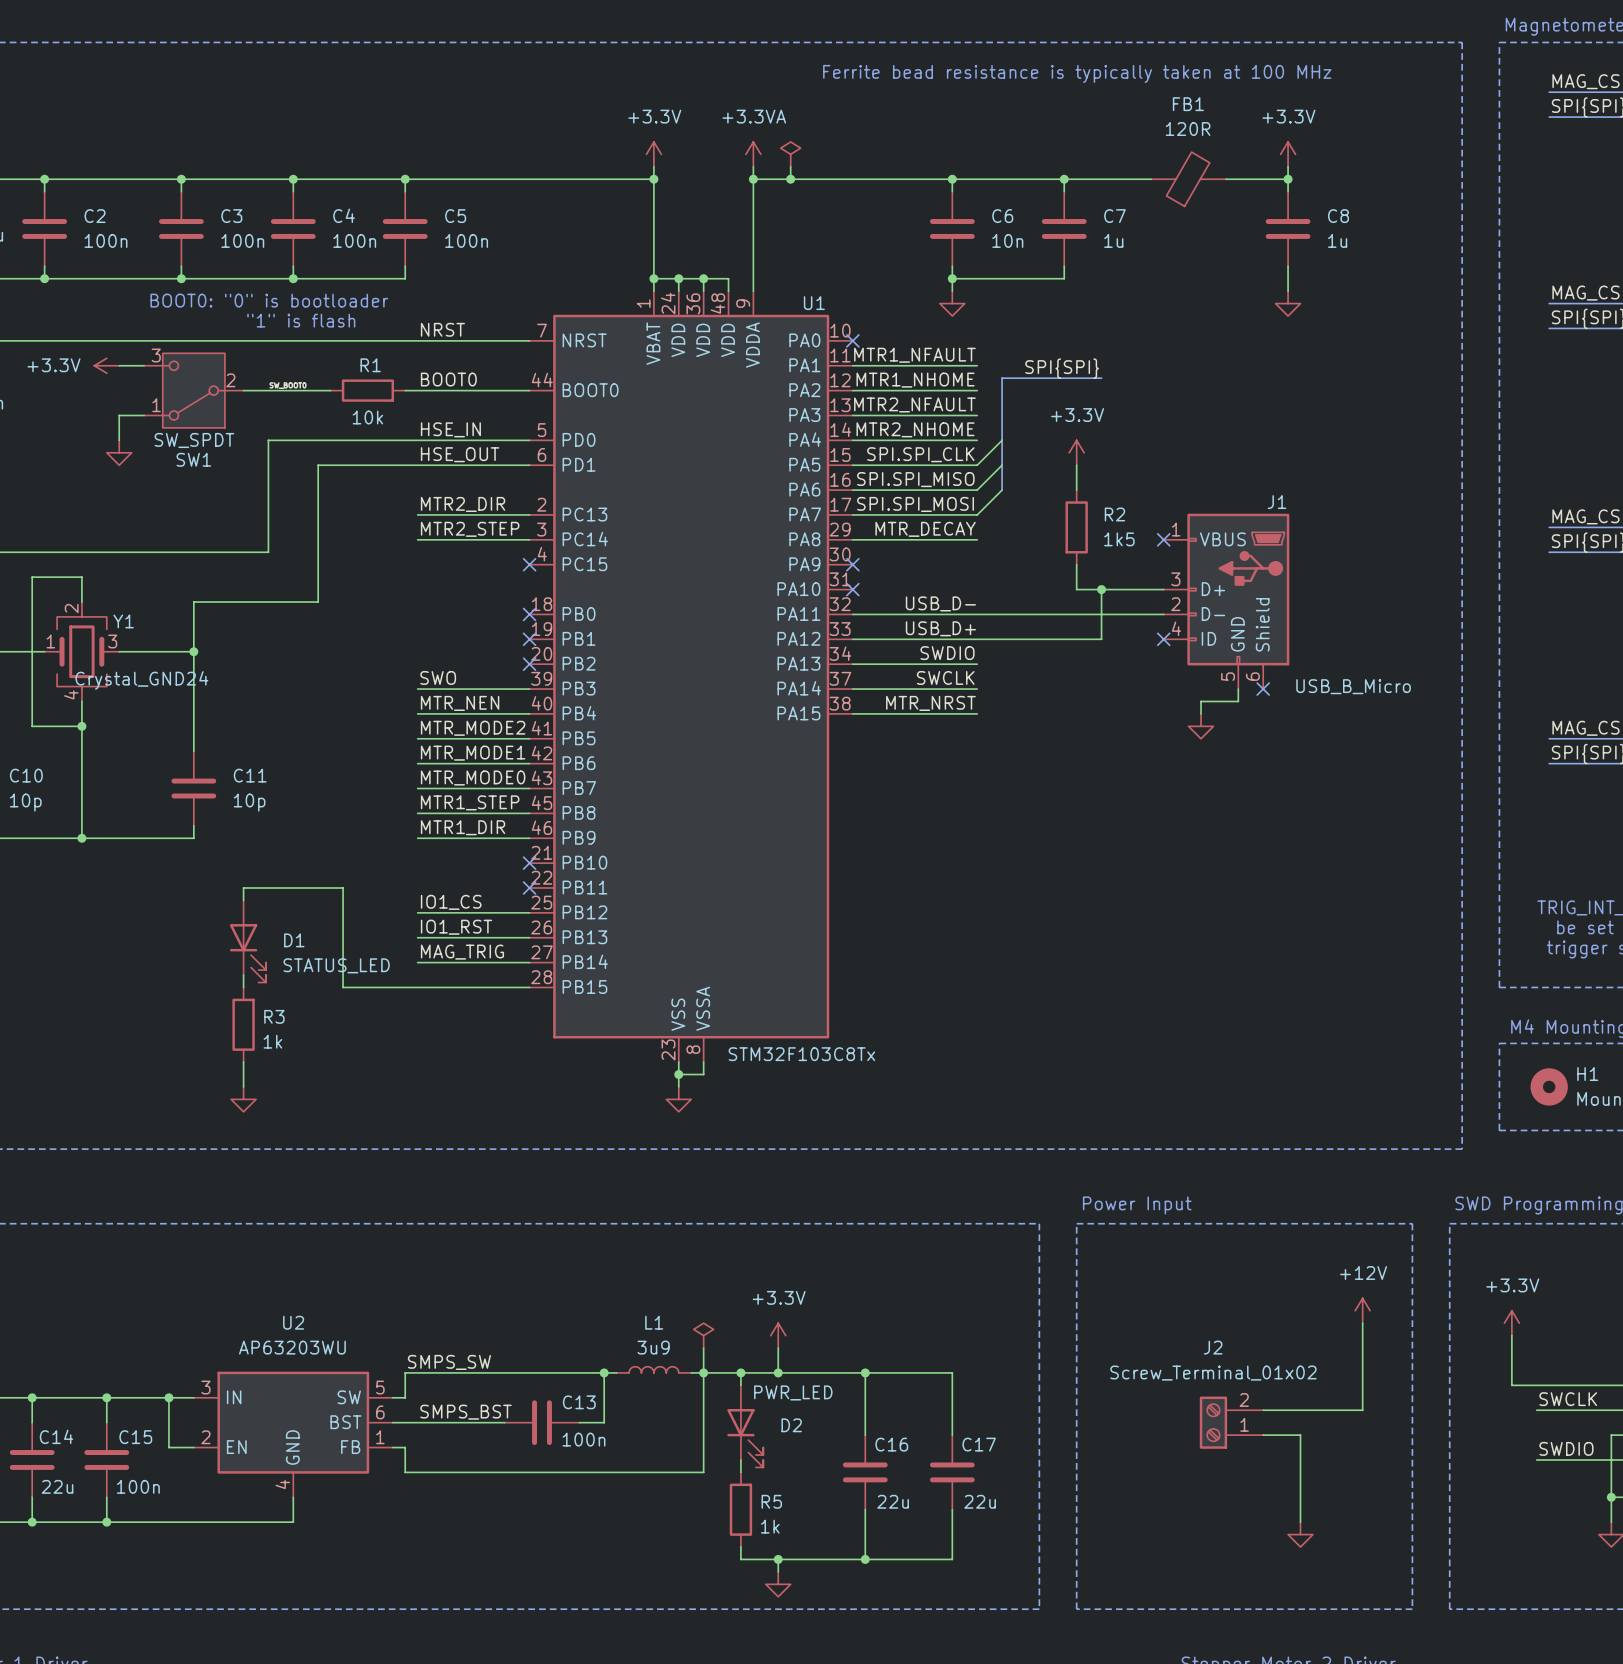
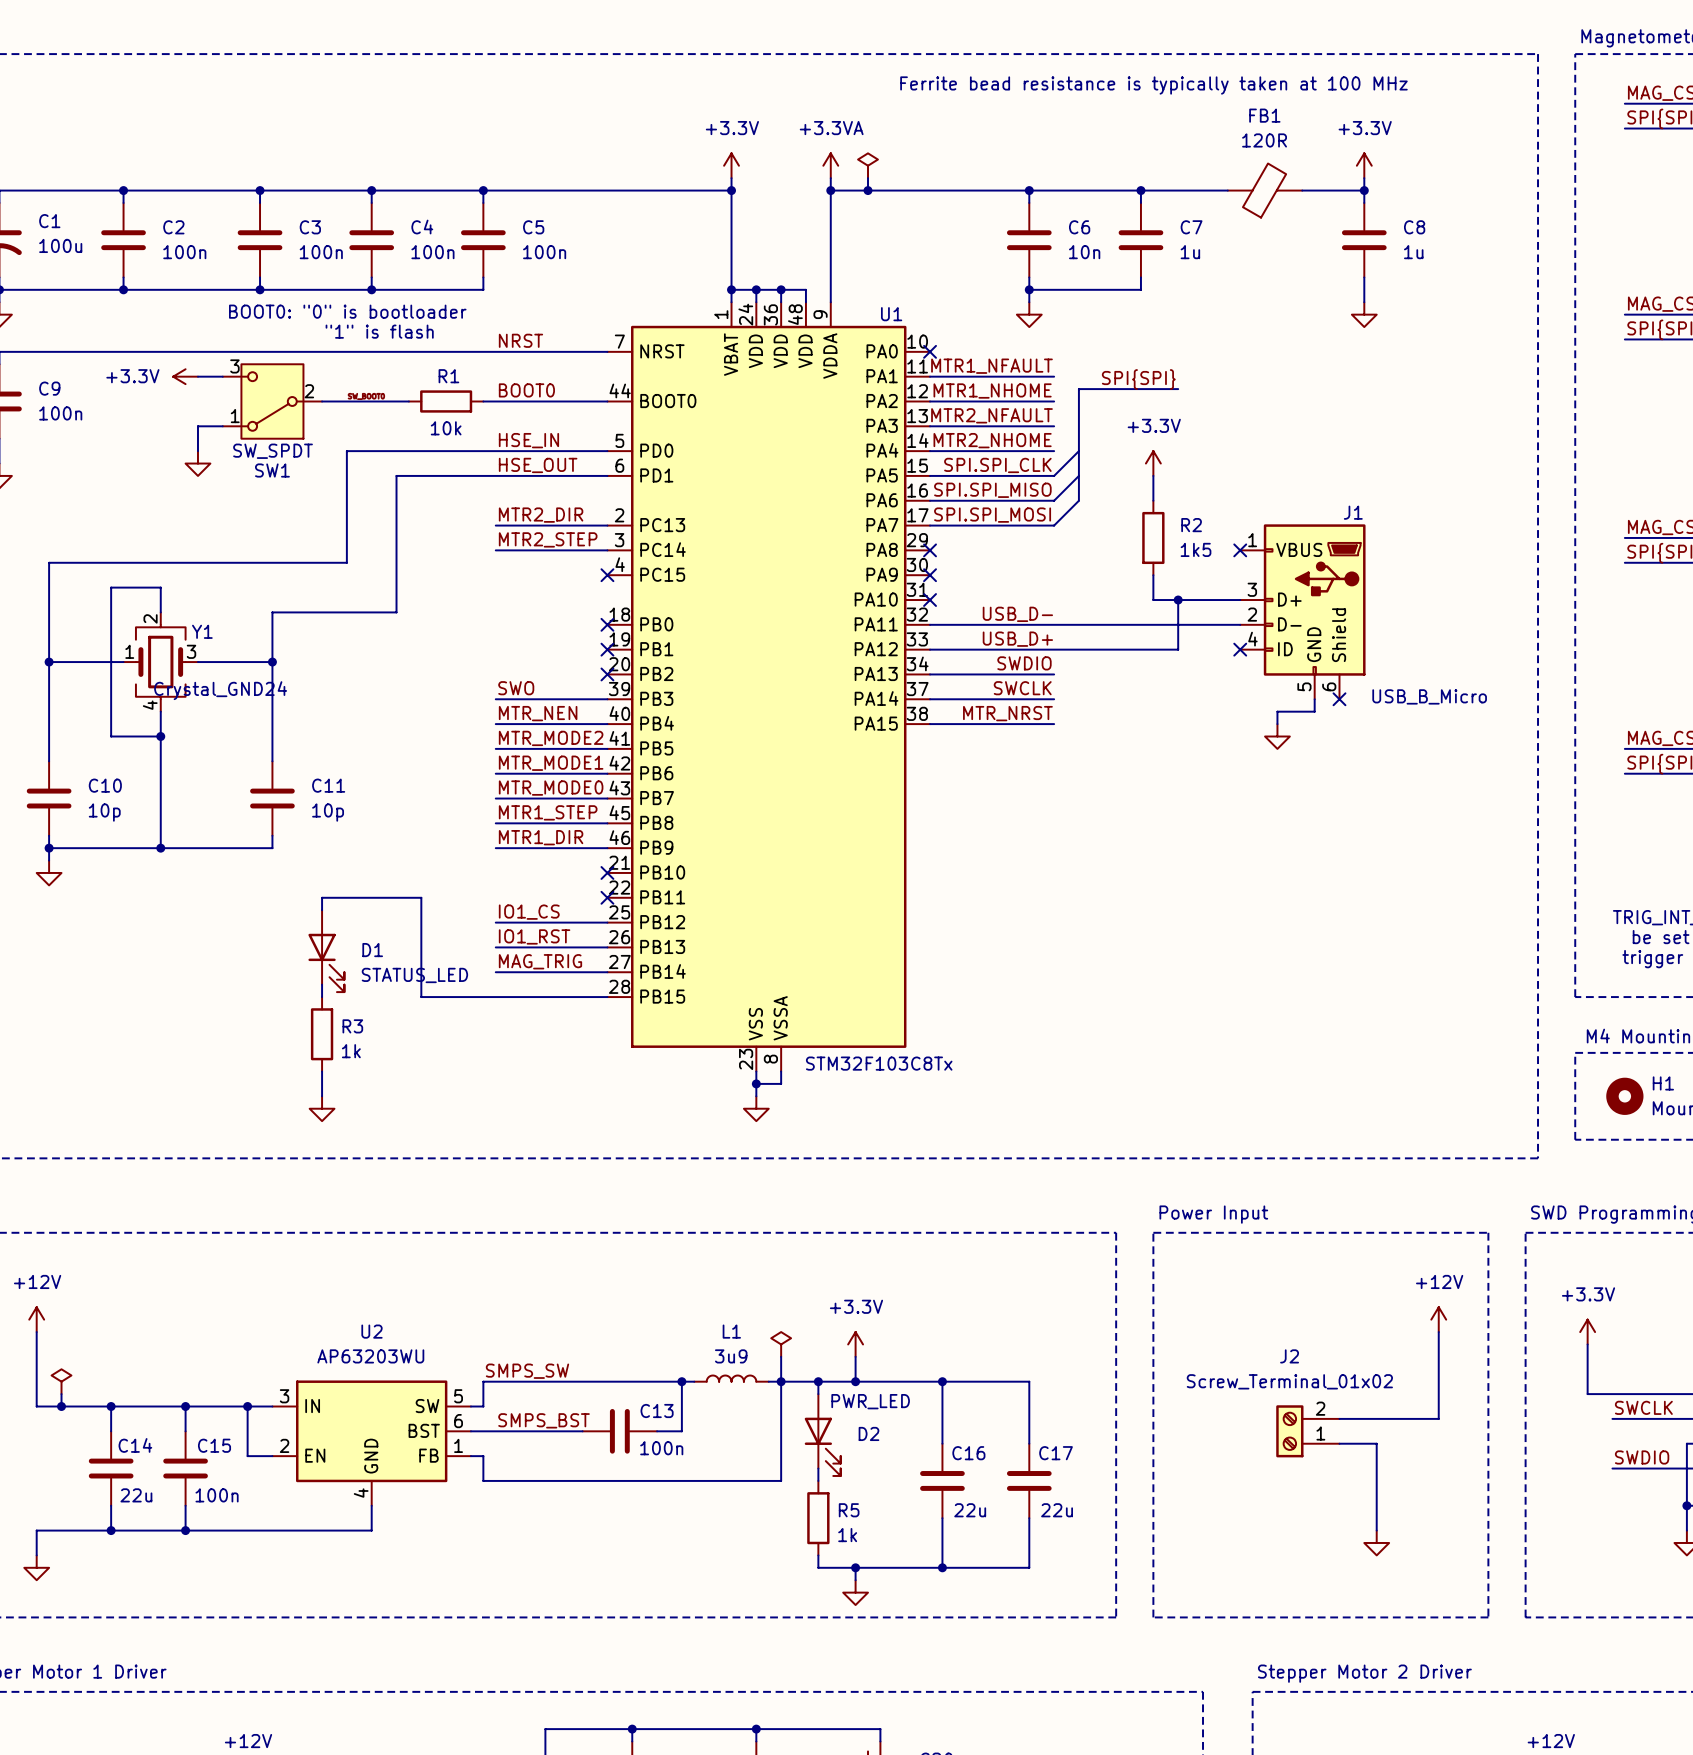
label: MTR_DECAY (925, 529) -> none
wire: (852, 539) (977, 539) -> none
no-connect mark: none -> (930, 550)

